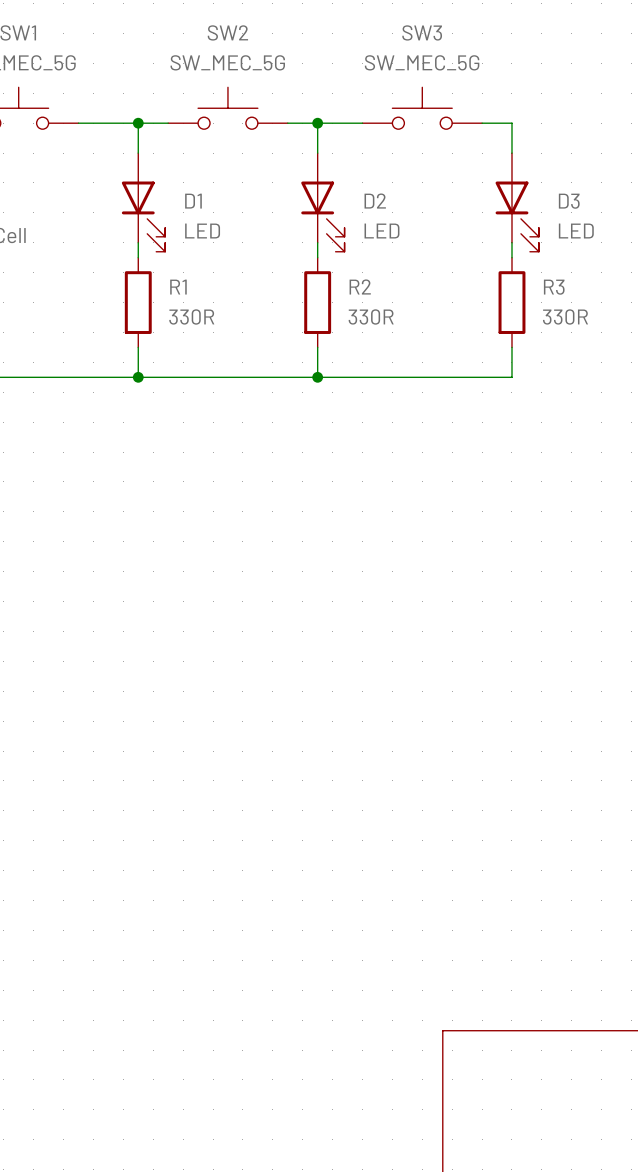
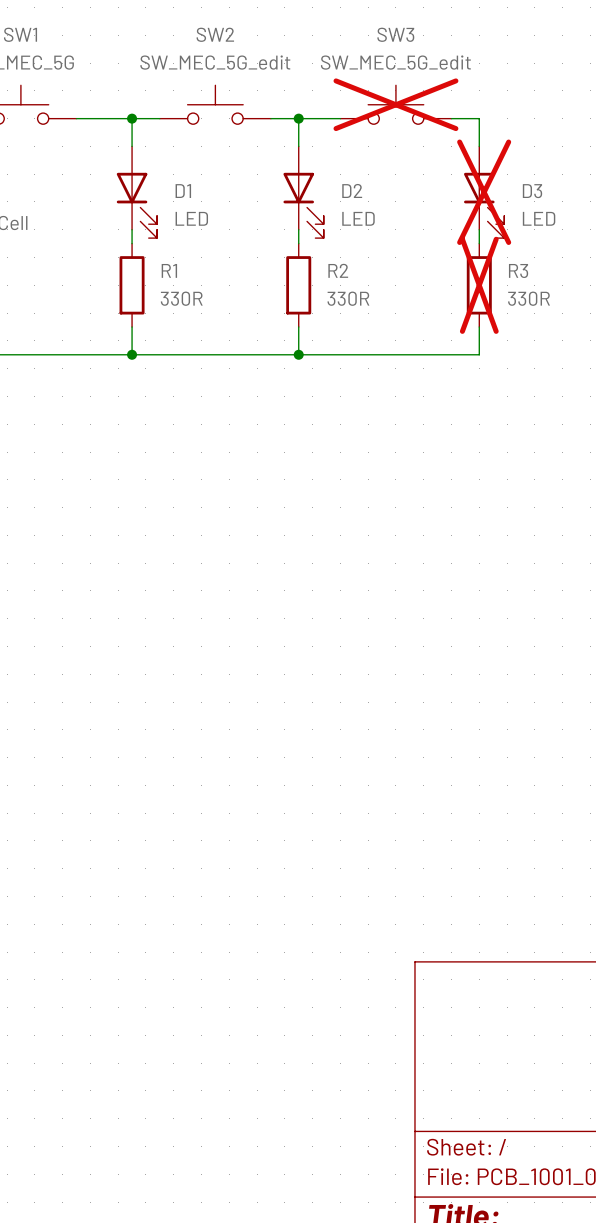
SW2 value: SW_MEC_5G (227, 62) -> SW_MEC_5G_edit (215, 62)
SW3 value: SW_MEC_5G (422, 62) -> SW_MEC_5G_edit (395, 62)
SW3 do-not-place cross: none -> (395, 104)
D3 do-not-place cross: none -> (484, 192)
R3 do-not-place cross: none -> (479, 285)

